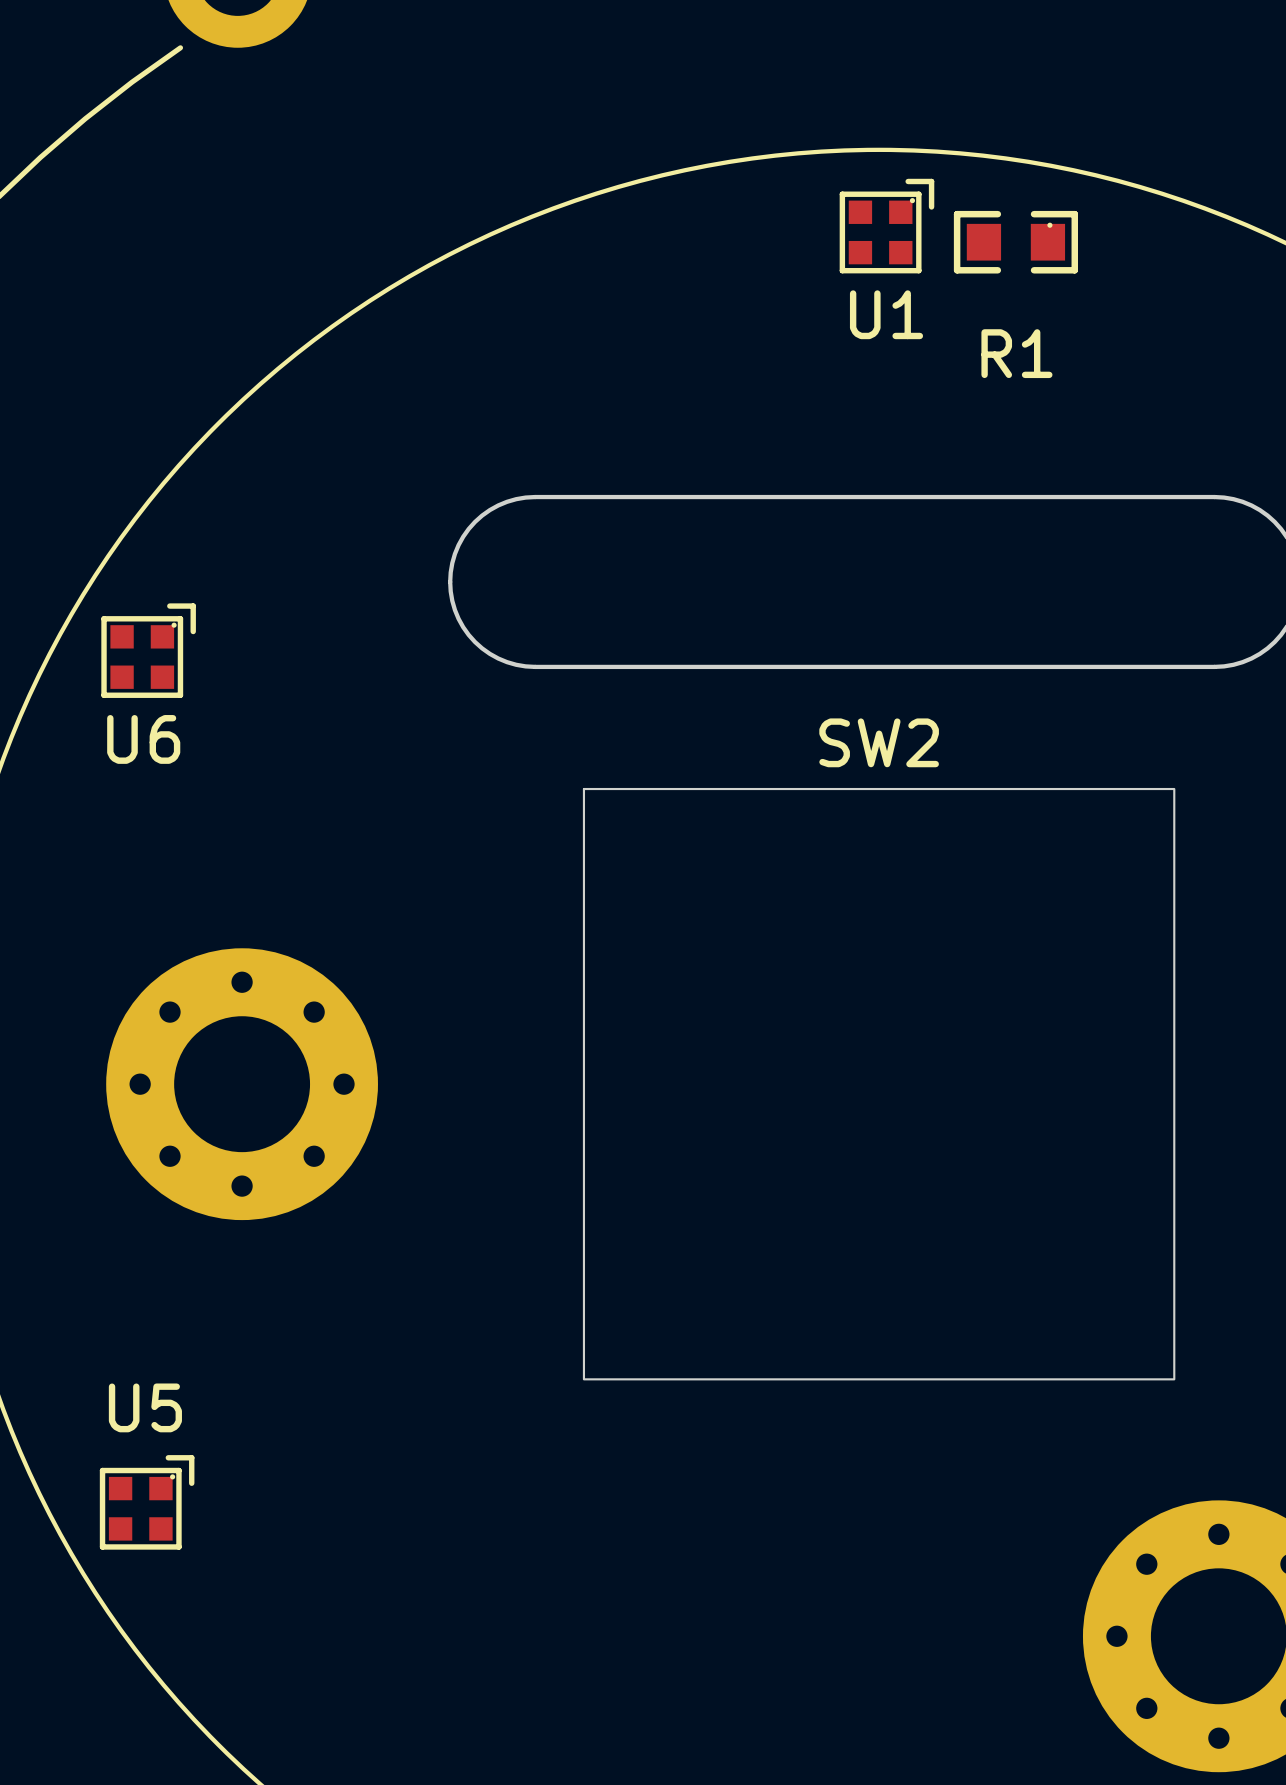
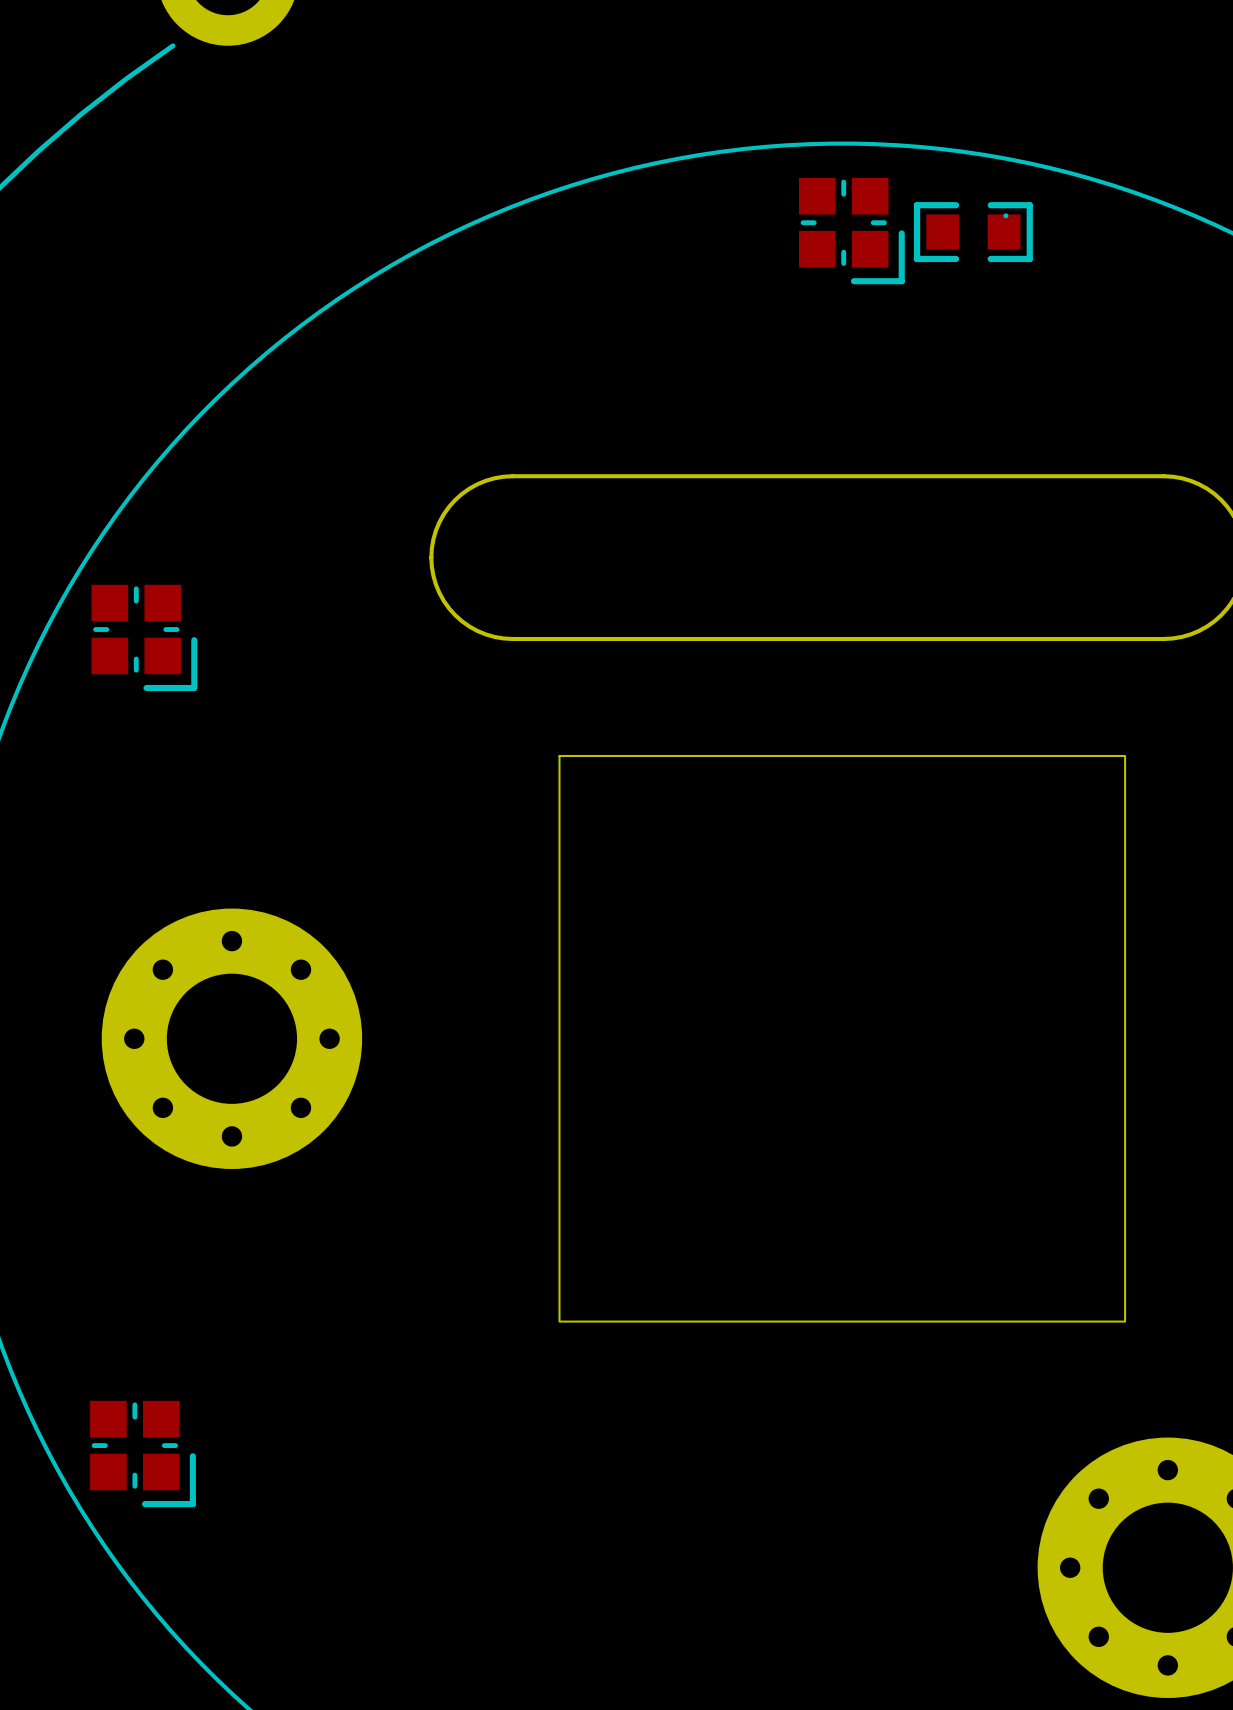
U1: (886, 226) -> none
part: none -> (851, 231)
R1 name: R1 (1016, 353) -> none
U6: (148, 650) -> none
part: none -> (144, 637)
SW2: (879, 1084) -> none
U5: (147, 1502) -> none
part: none -> (143, 1453)

